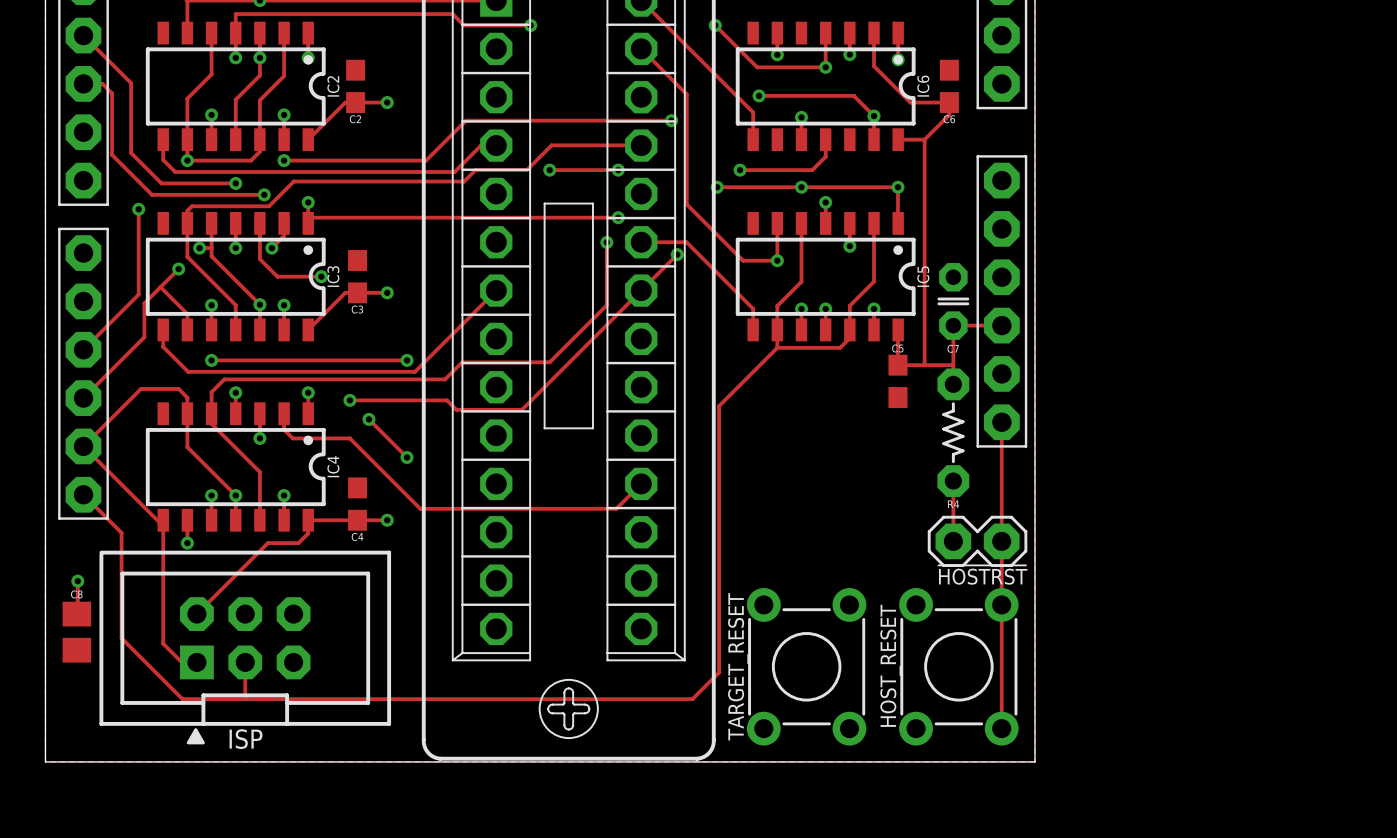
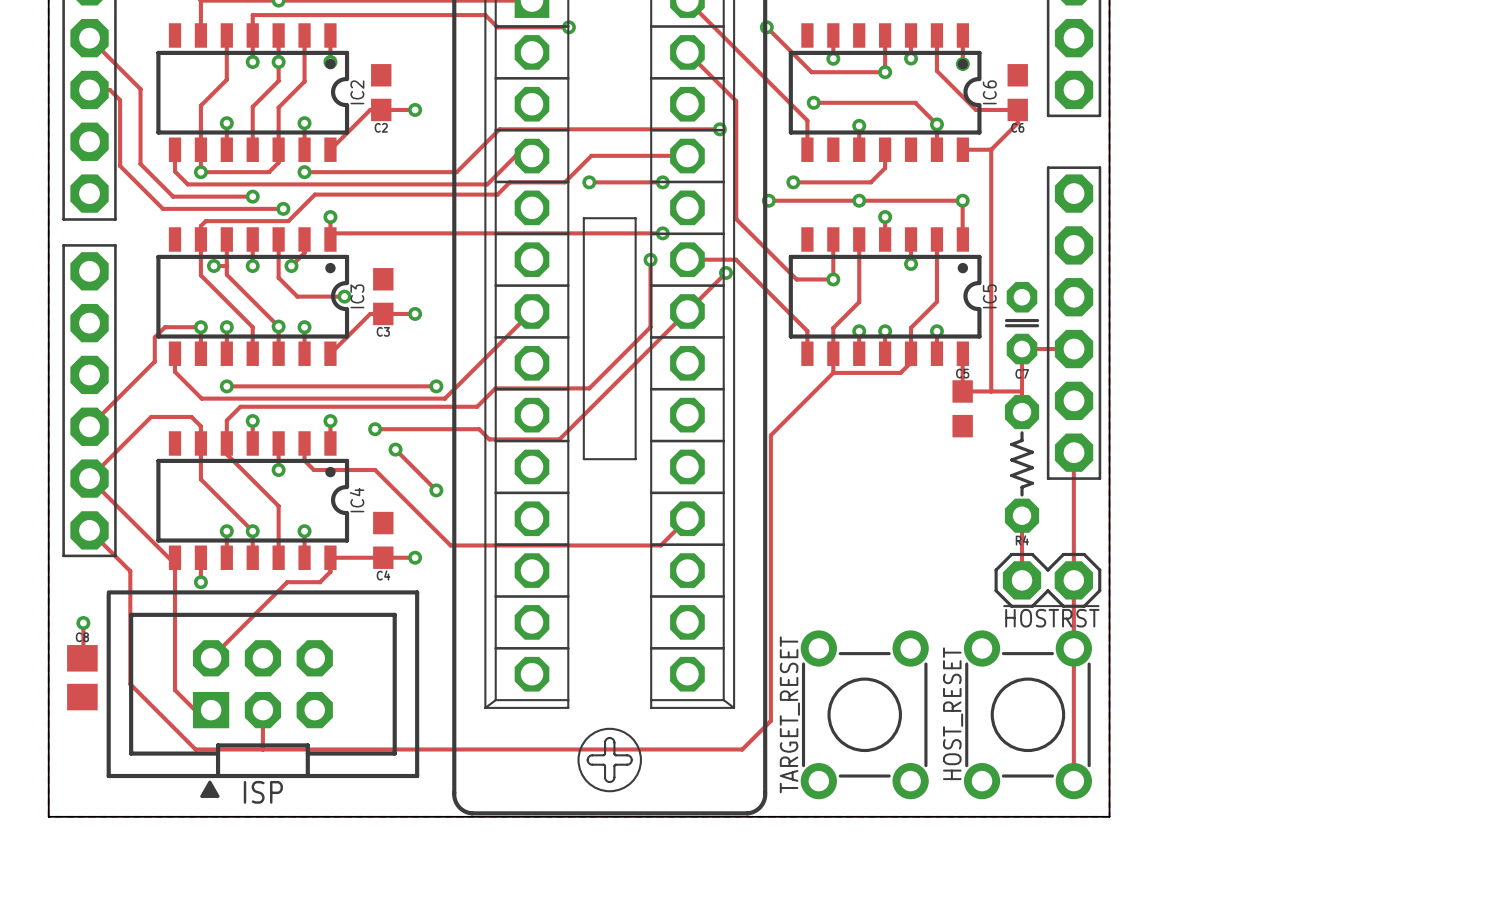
track: (138, 209) (138, 294) (83, 349) -> none
via: (138, 209) -> none
track: (178, 269) (144, 303) (144, 314) -> none
via position: (178, 269) -> (200, 327)
track: (160, 287) (187, 313) -> (154, 337) (165, 327) (200, 327) (200, 336)

